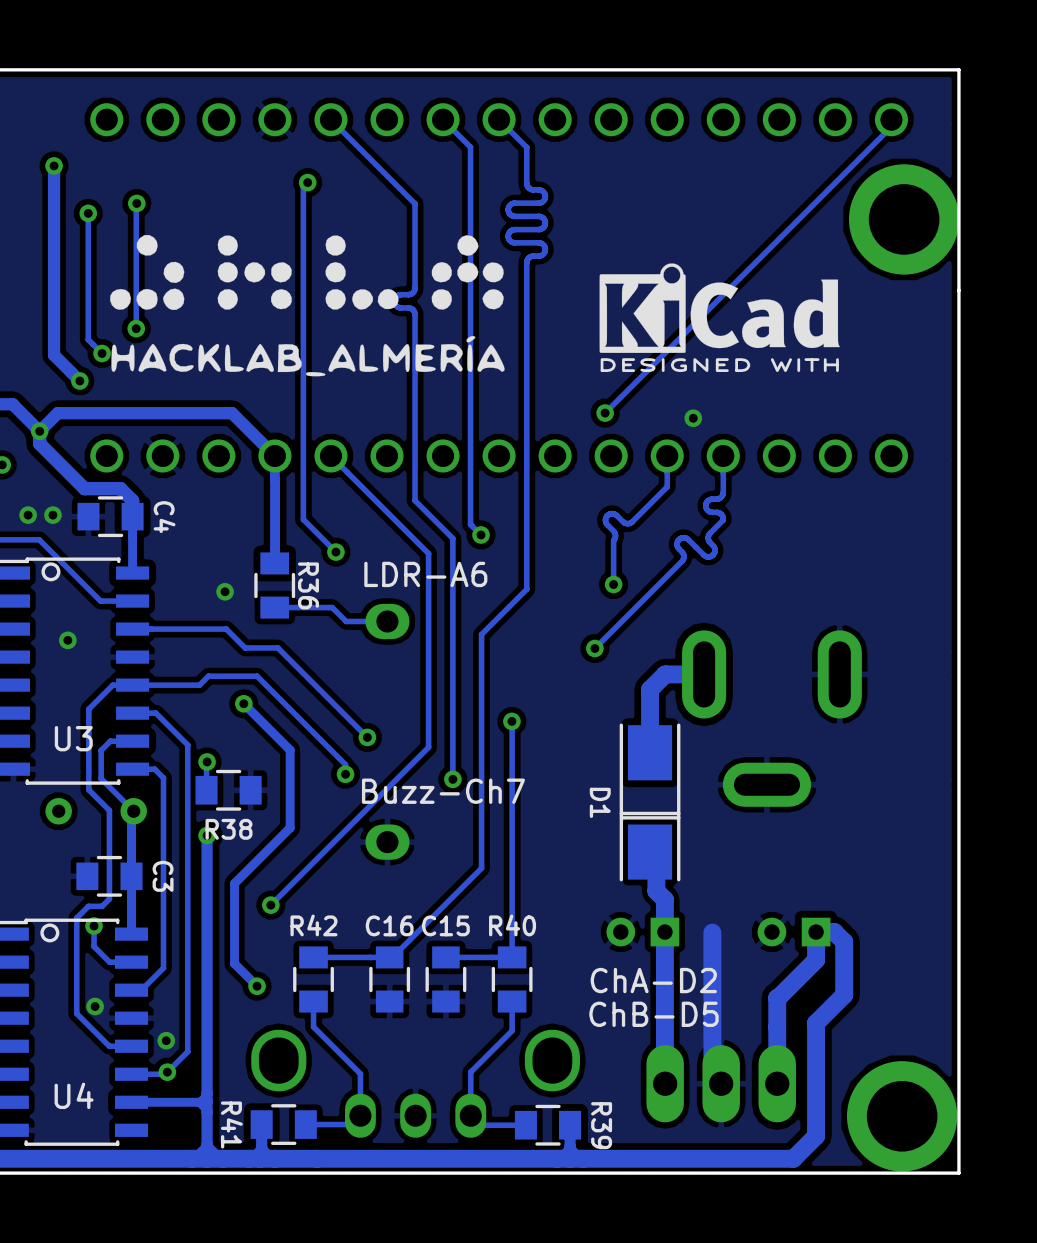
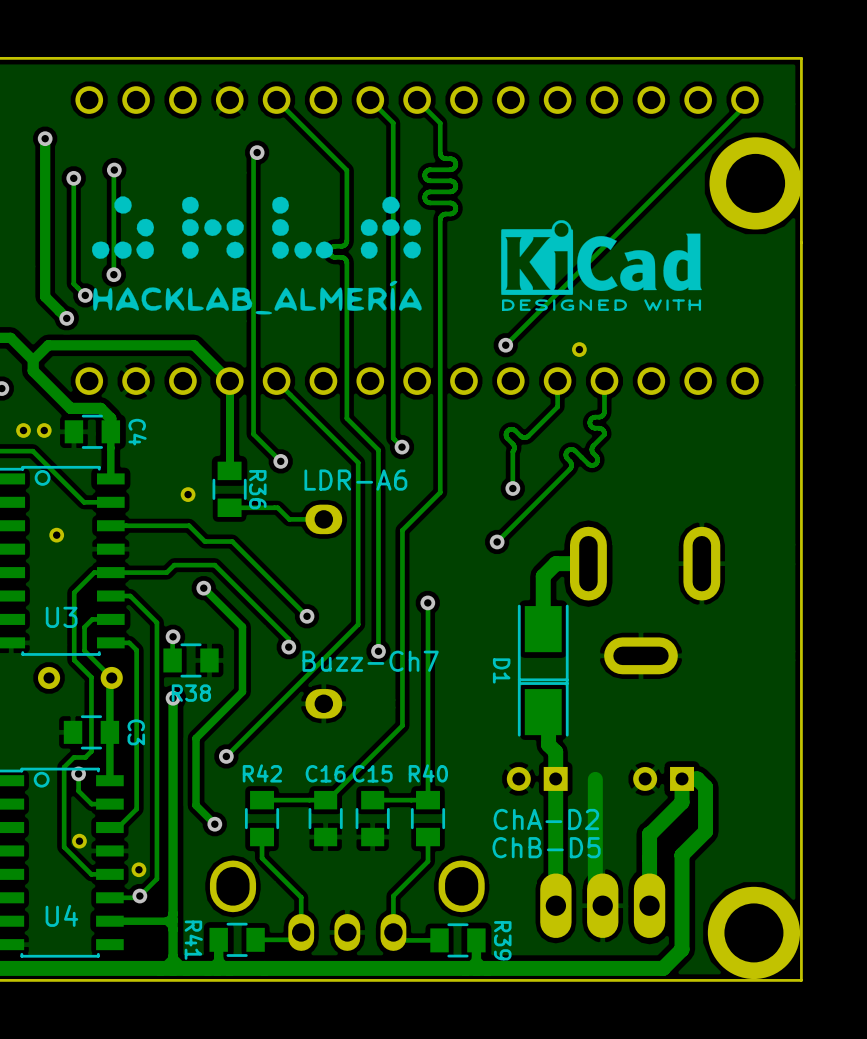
via: (39, 431) -> none

